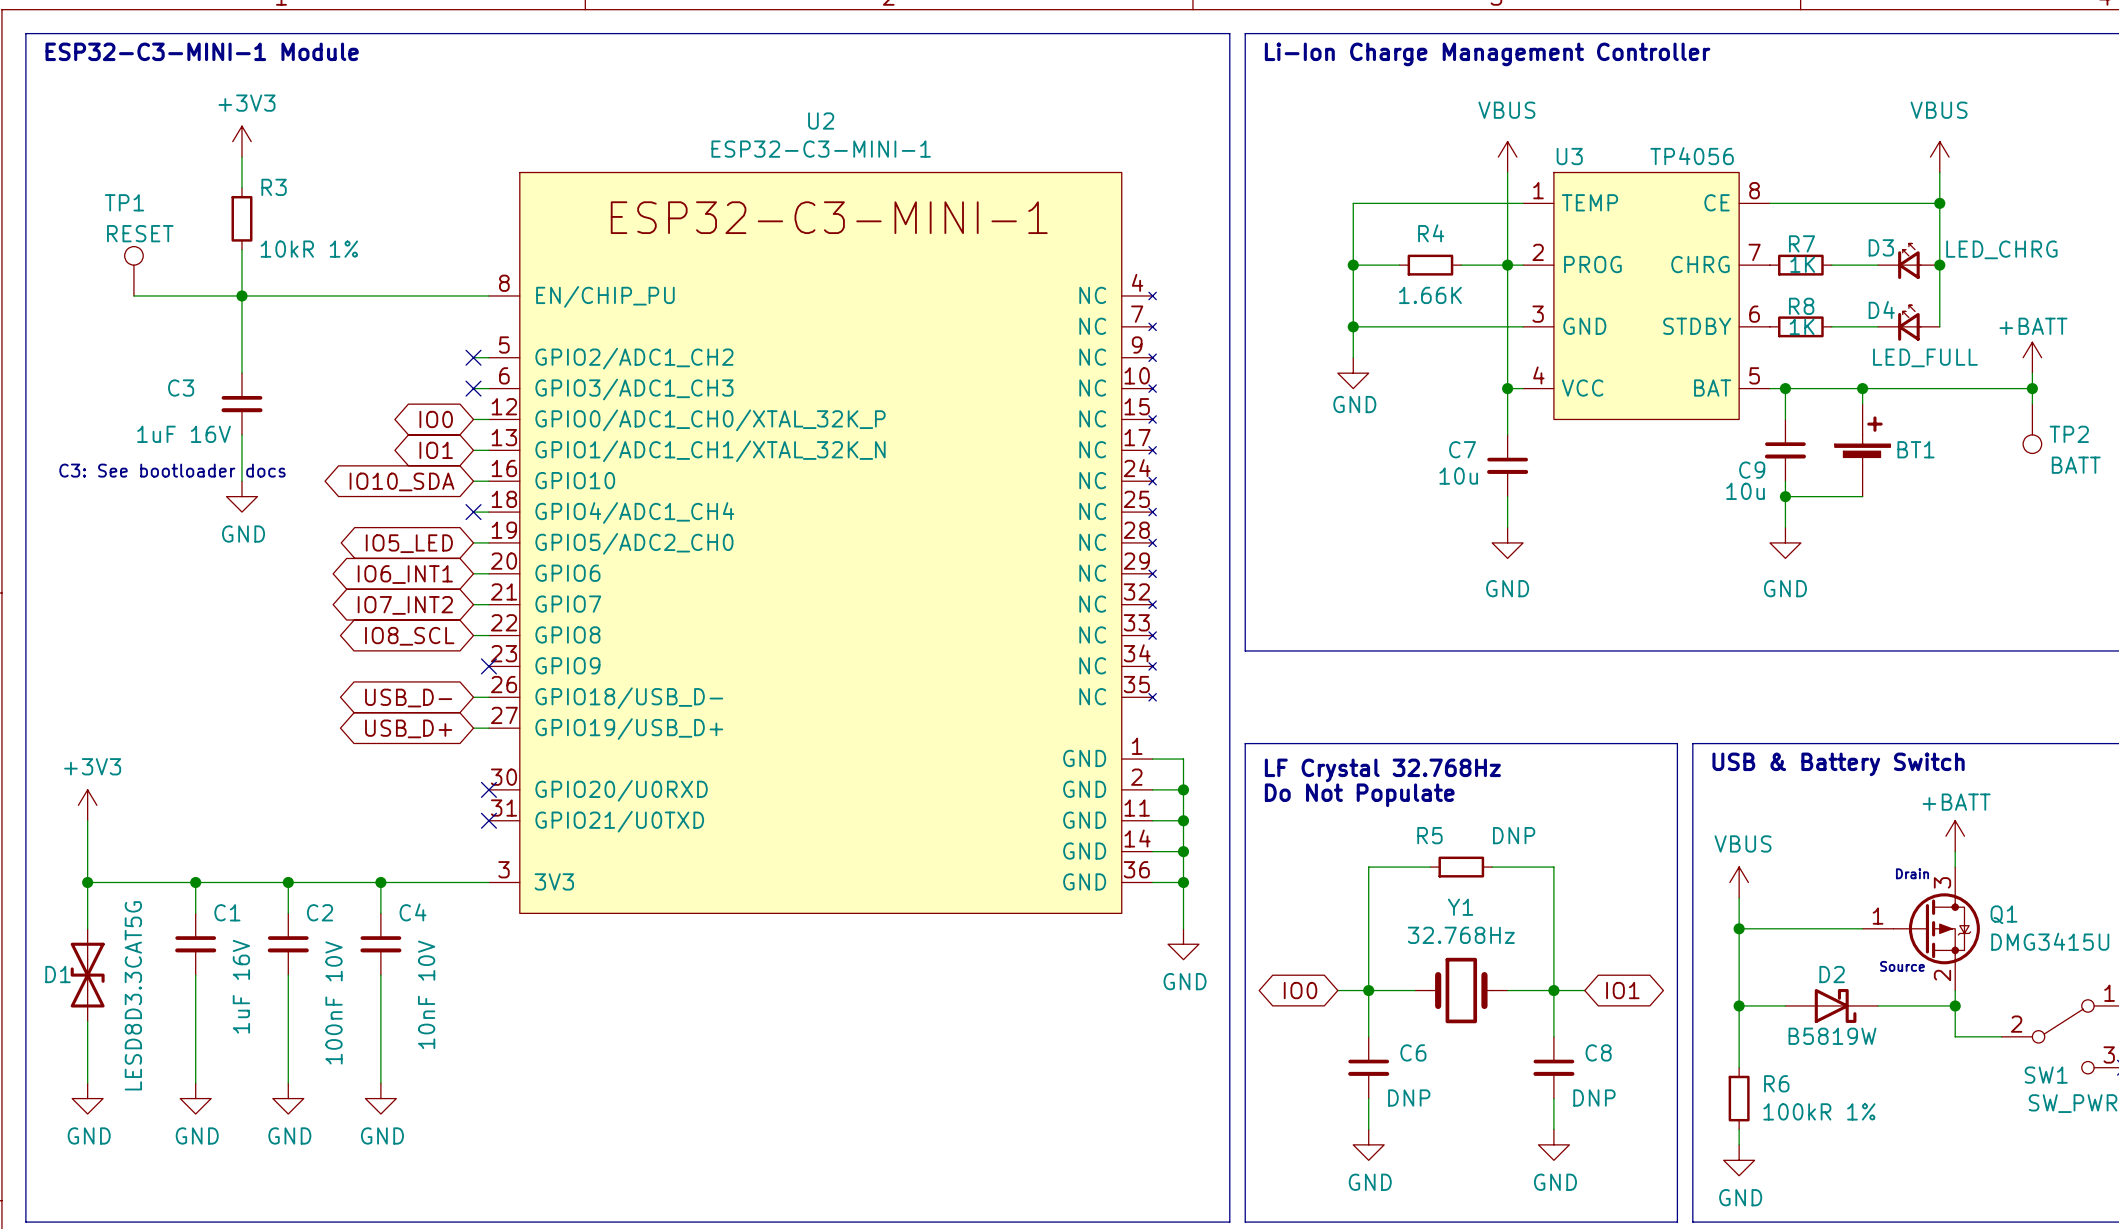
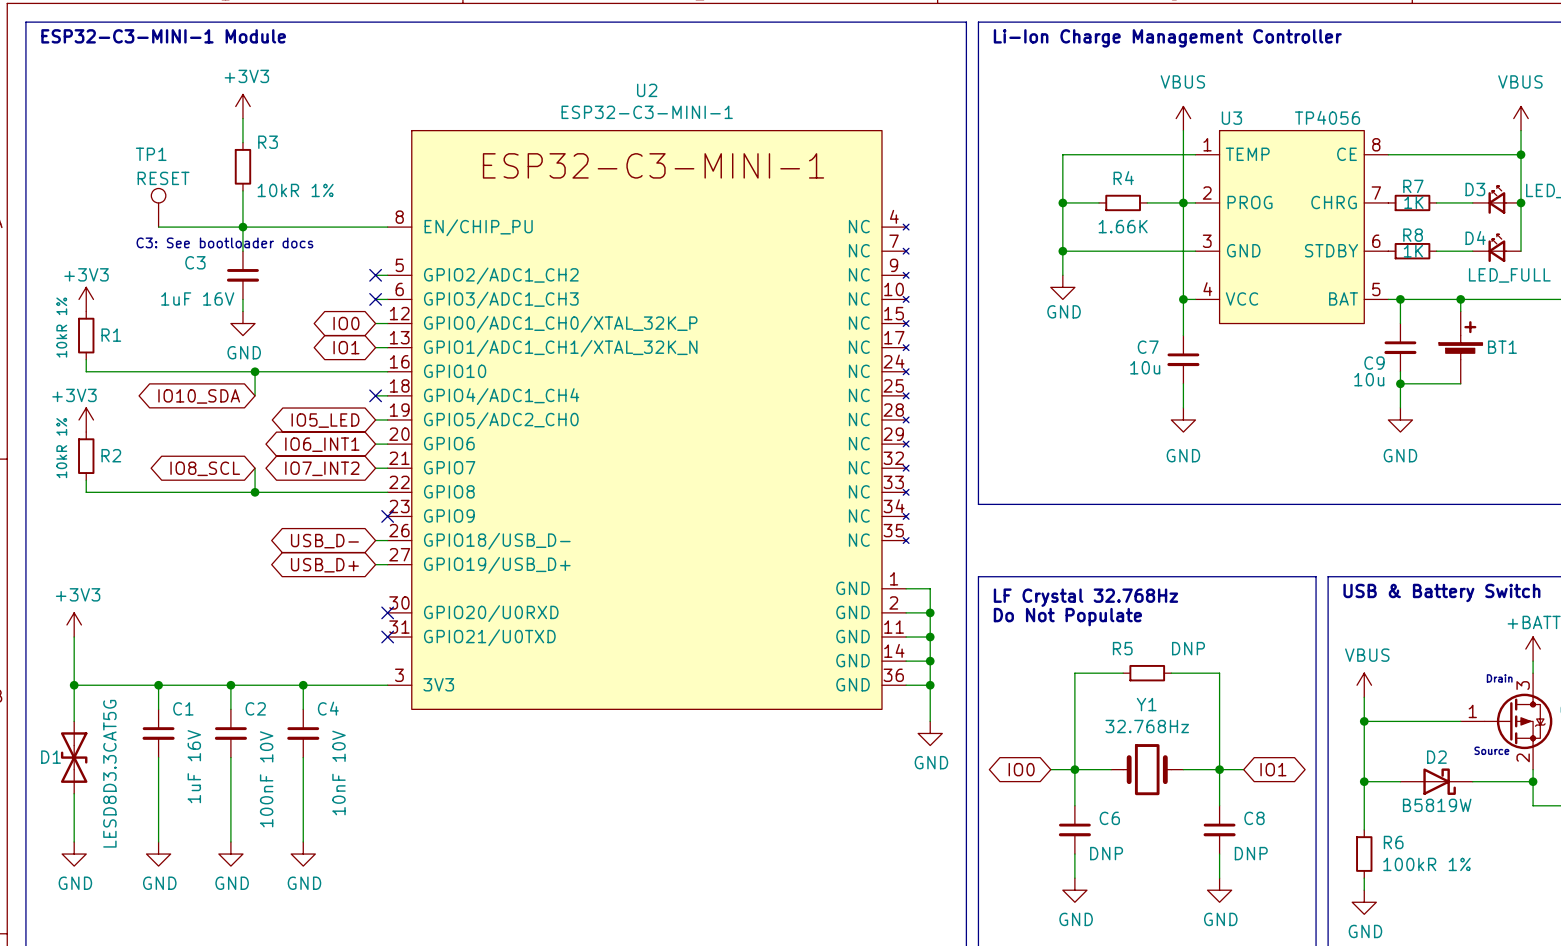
power symbol position: +3V3 (241, 141) -> +3V3 (242, 106)
wire: (241, 157) (241, 187) -> (242, 118) (242, 142)
R3 position: (241, 218) -> (242, 166)
wire: (241, 249) (241, 373) -> none
wire: none -> (242, 190) (242, 251)
TP1 position: (133, 271) -> (158, 207)
wire: (133, 295) (195, 295) -> none
junction position: (241, 295) -> (242, 227)
power symbol: none -> +3V3 (86, 299)
wire: none -> (242, 299) (242, 311)
C3 position: (241, 404) -> (242, 275)
R1: none -> 10kR 1% (86, 335)
wire: (241, 434) (241, 481) -> none
wire: none -> (86, 359) (86, 371) (375, 371)
text position: C3: See bootloader docs (172, 470) -> C3: See bootloader docs (224, 242)
wire: none -> (255, 371) (255, 395)
junction: none -> (255, 371)
global label position: IO10_SDA (402, 481) -> IO10_SDA (199, 396)
power symbol position: GND (241, 496) -> GND (242, 323)
power symbol: none -> +3V3 (86, 419)
R2: none -> 10kR 1% (86, 456)
wire: none -> (255, 468) (255, 492)
wire: none -> (86, 480) (86, 492) (375, 492)
junction: none -> (255, 492)
global label position: IO8_SCL (409, 636) -> IO8_SCL (205, 468)

